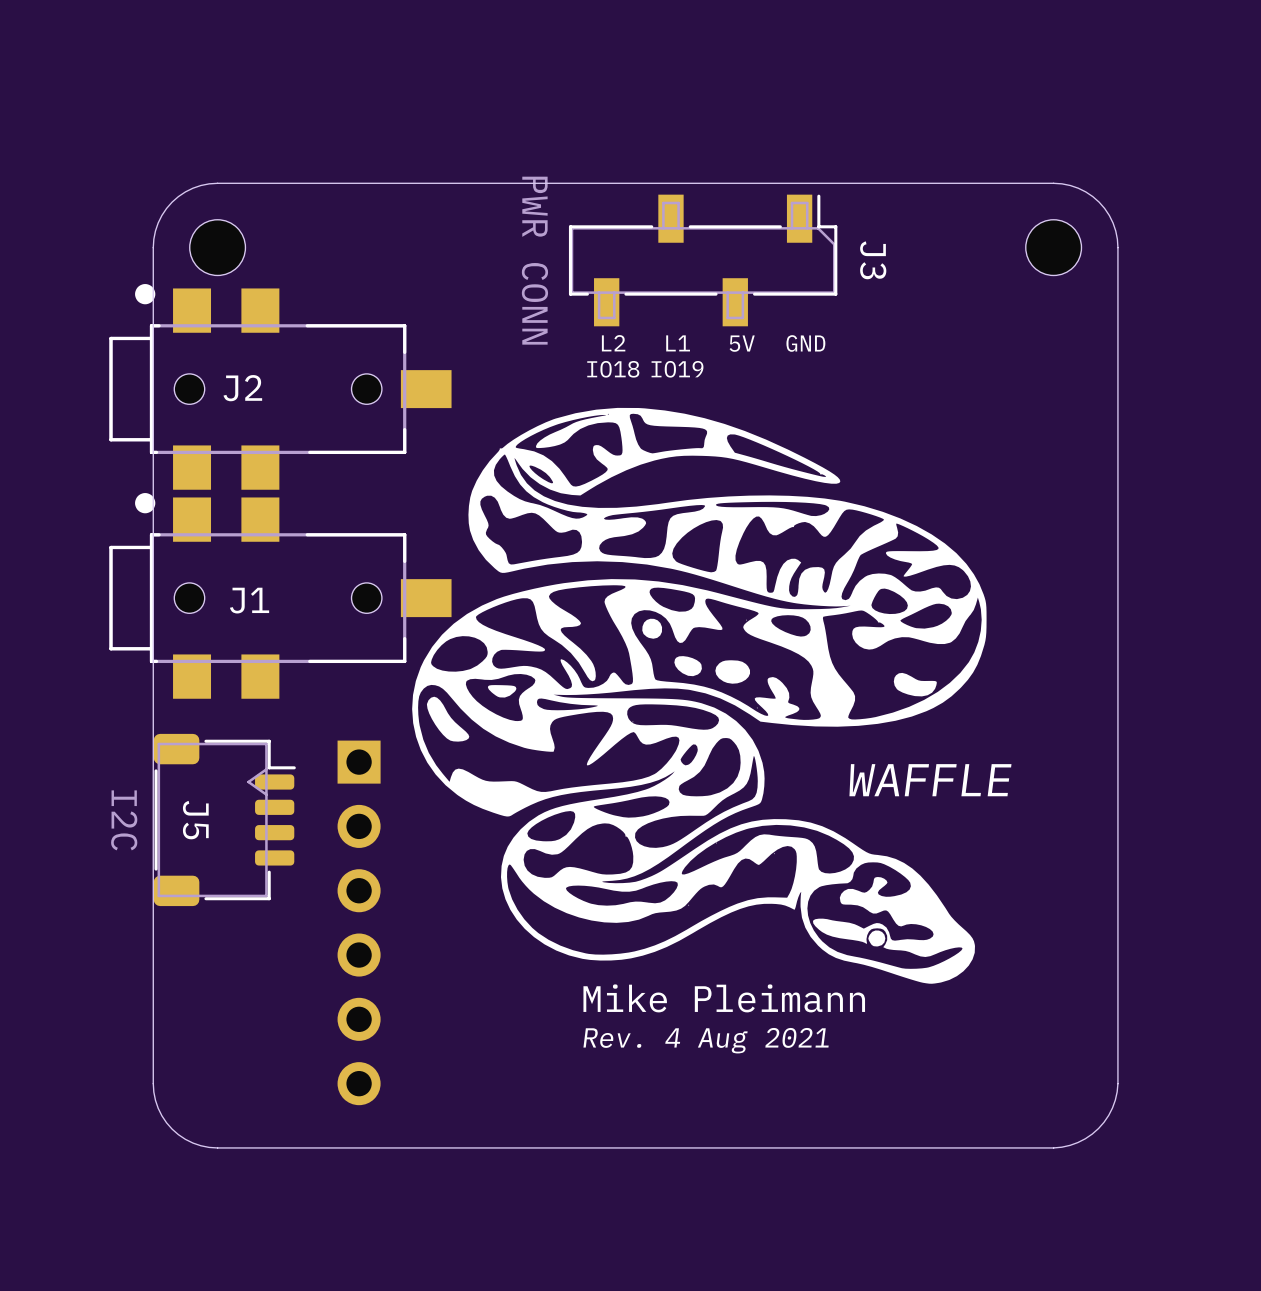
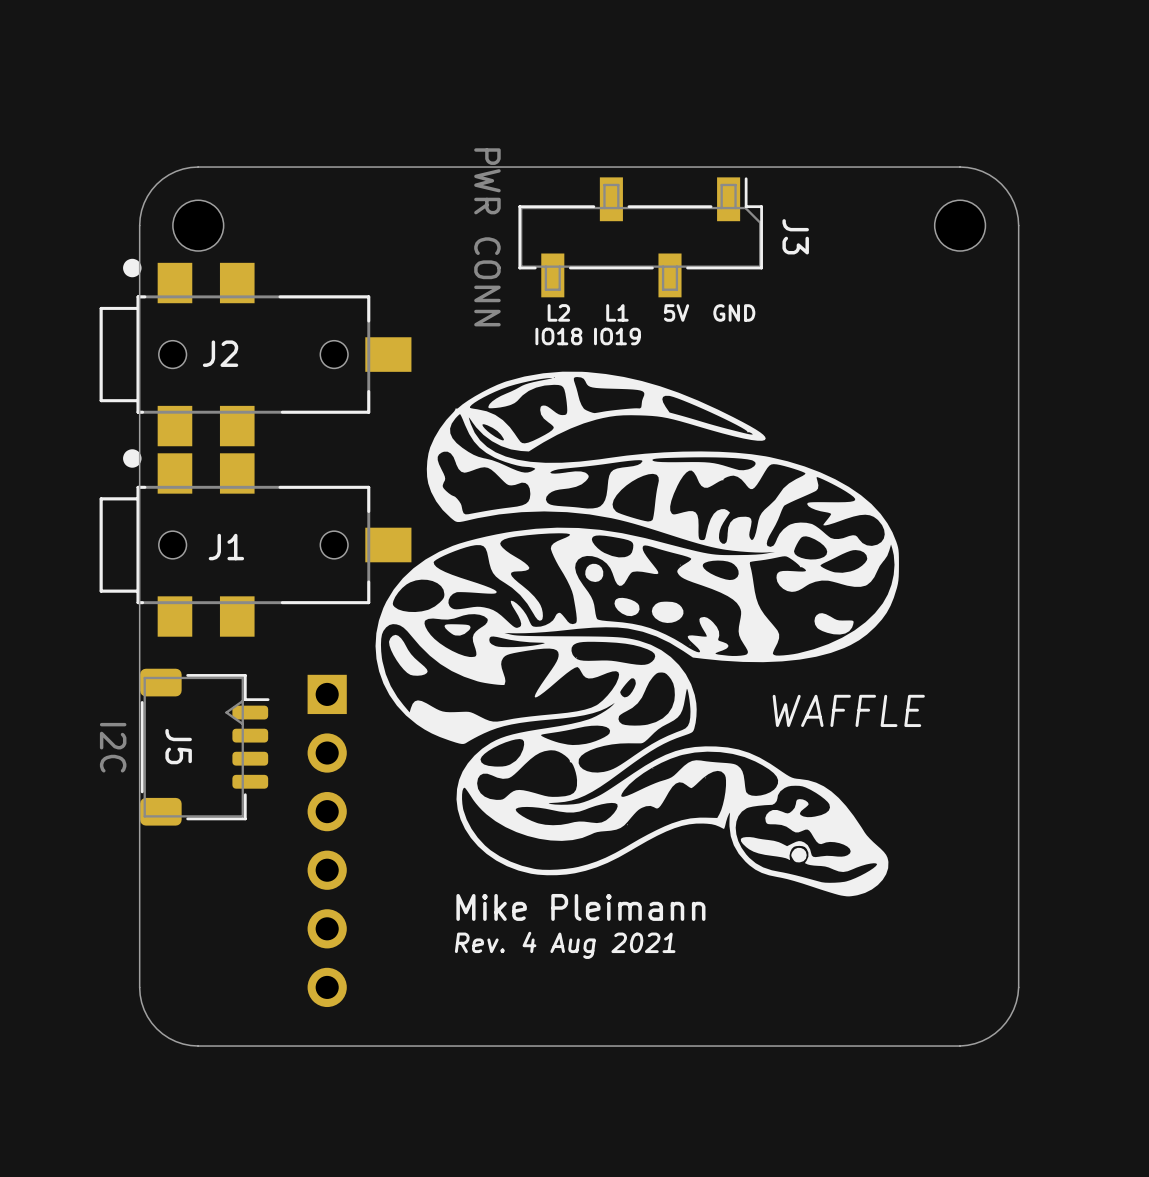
text position: Mike Pleimann (724, 998) -> Mike Pleimann (580, 907)
text position: Rev. 4 Aug 2021 (706, 1040) -> Rev. 4 Aug 2021 (565, 945)

